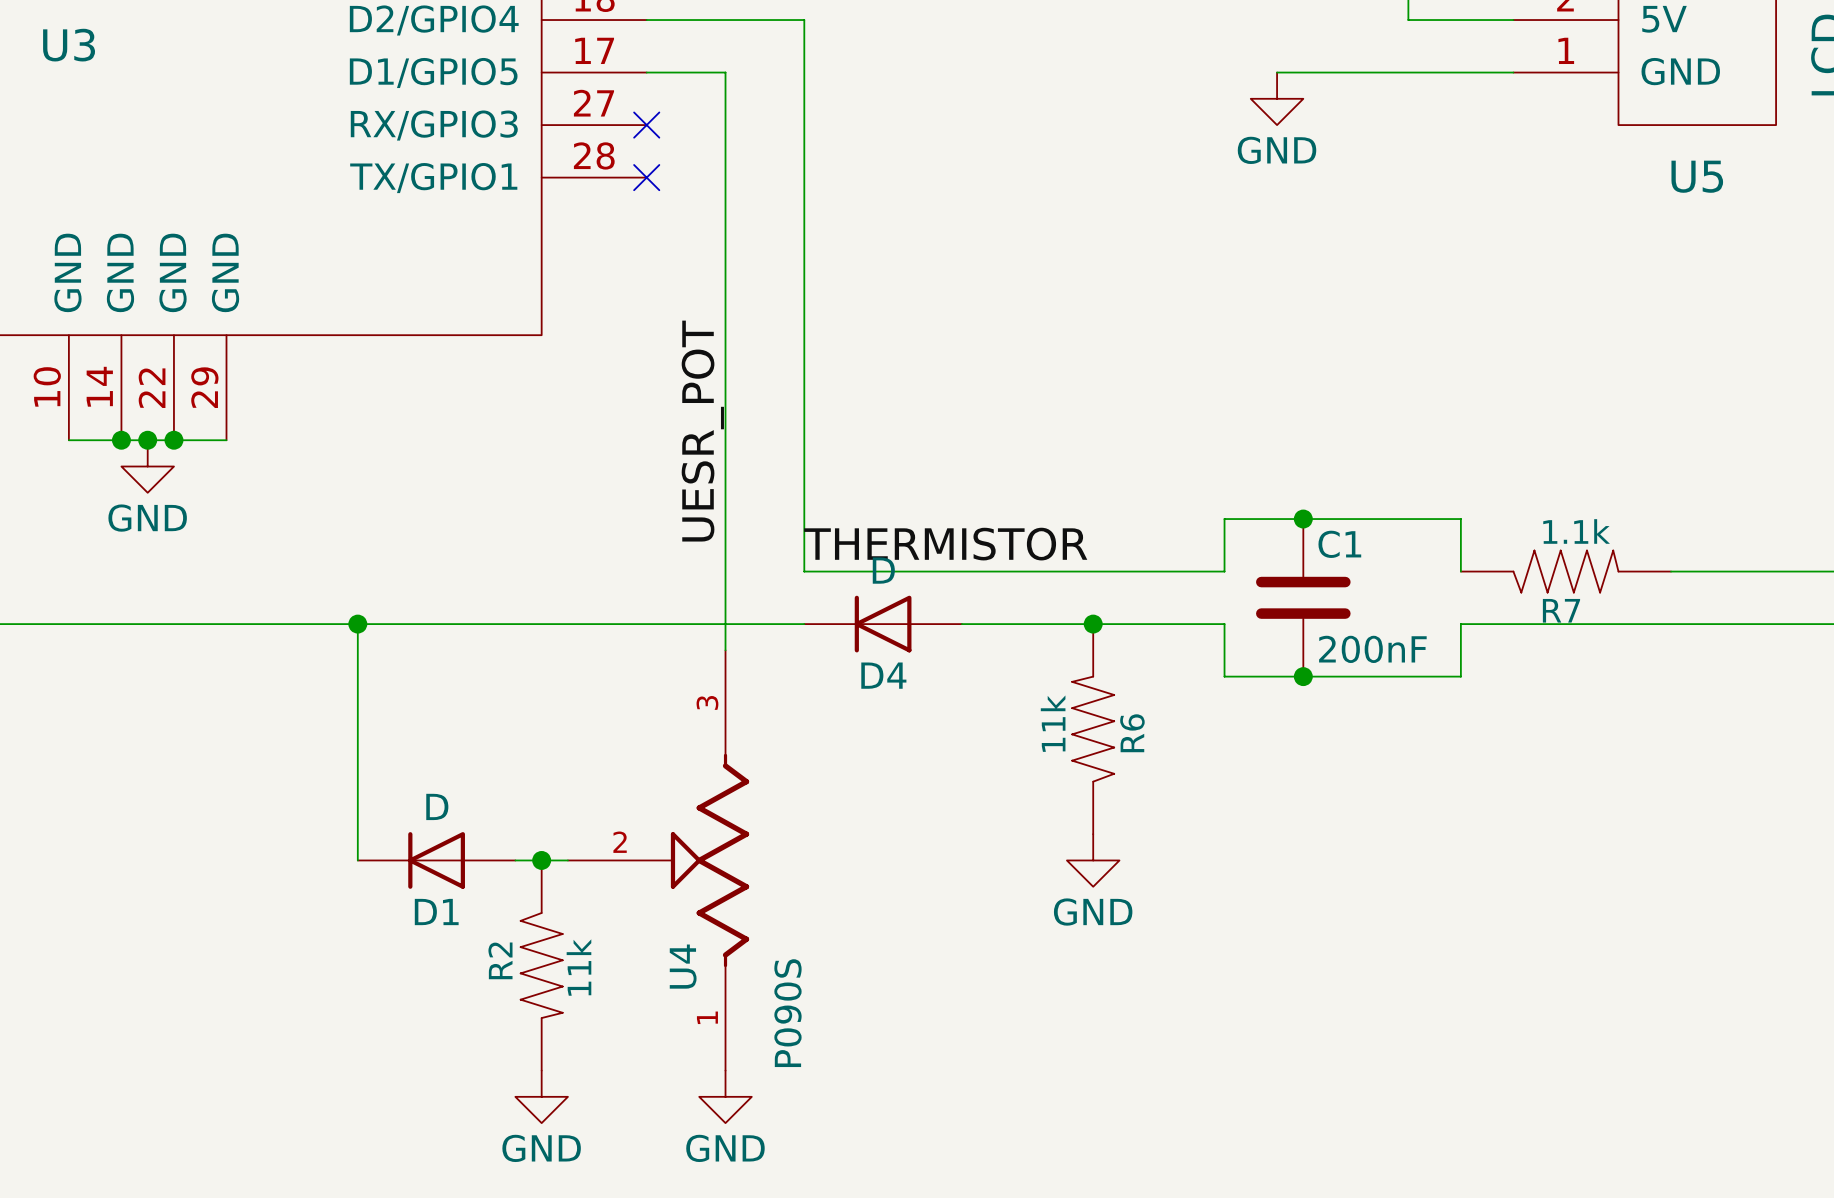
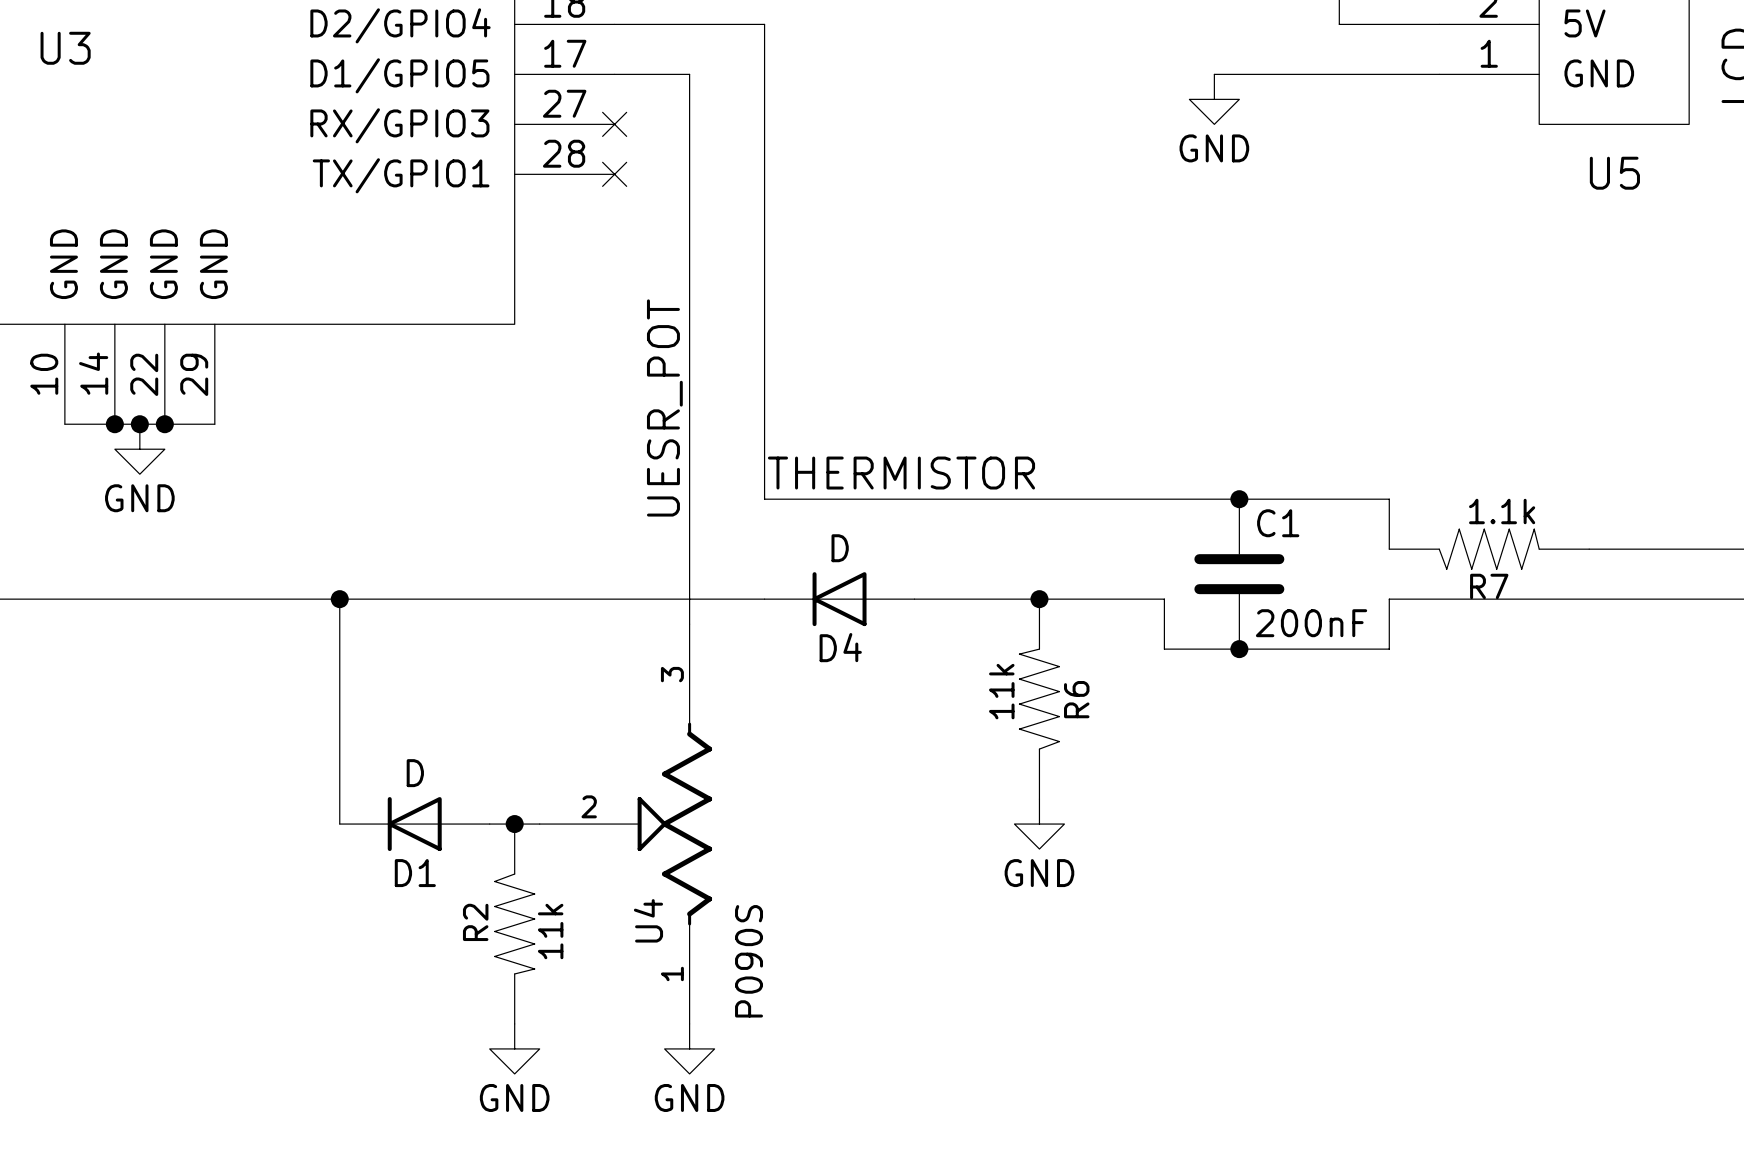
wire: (804, 519) (804, 571) (1224, 571) (1224, 519) -> (764, 499) (1164, 499)
label position: THERMISTOR (945, 544) -> THERMISTOR (901, 473)

